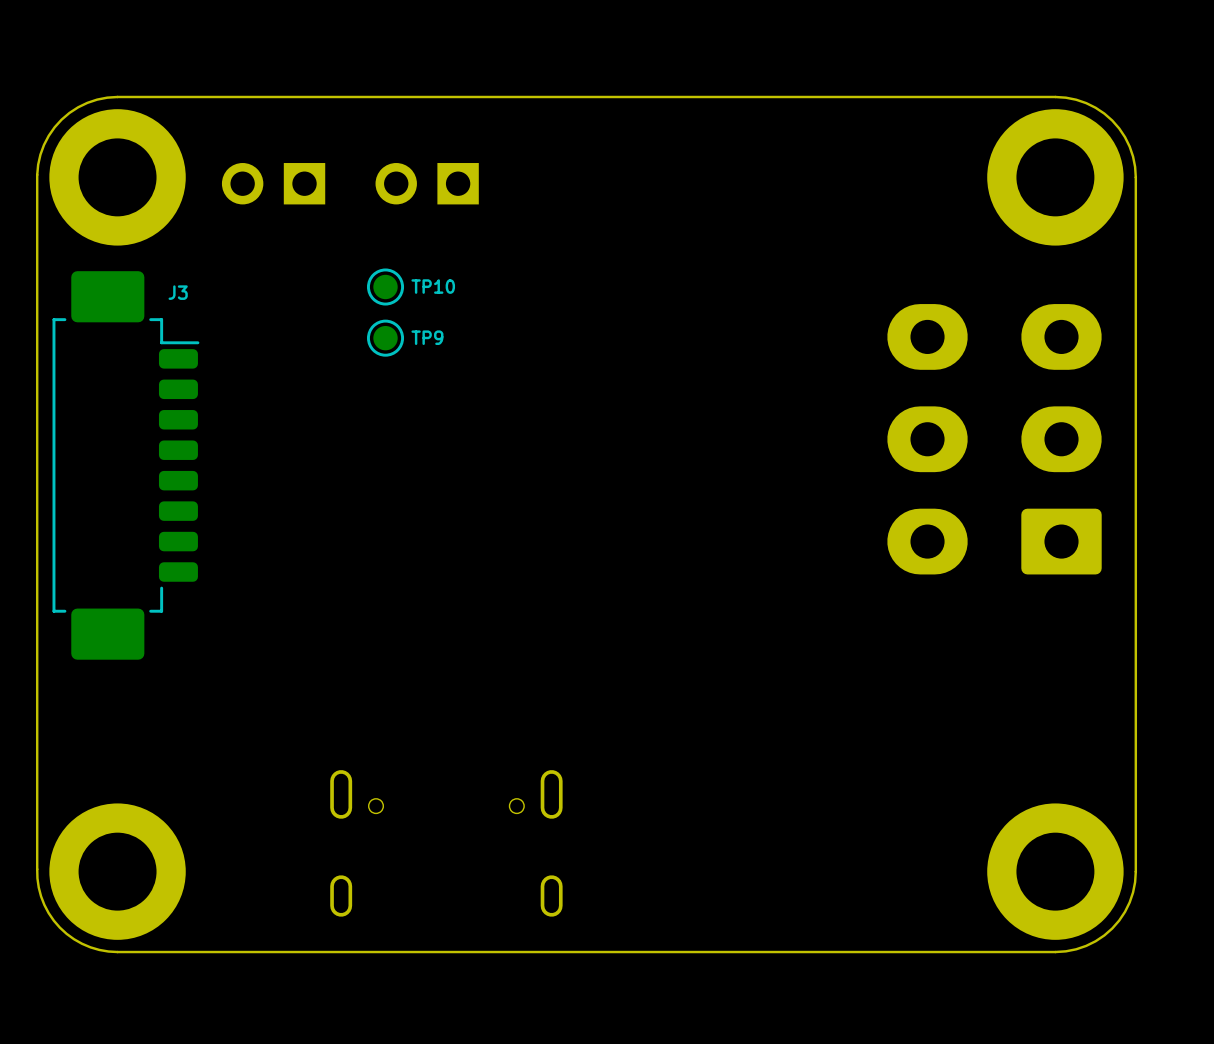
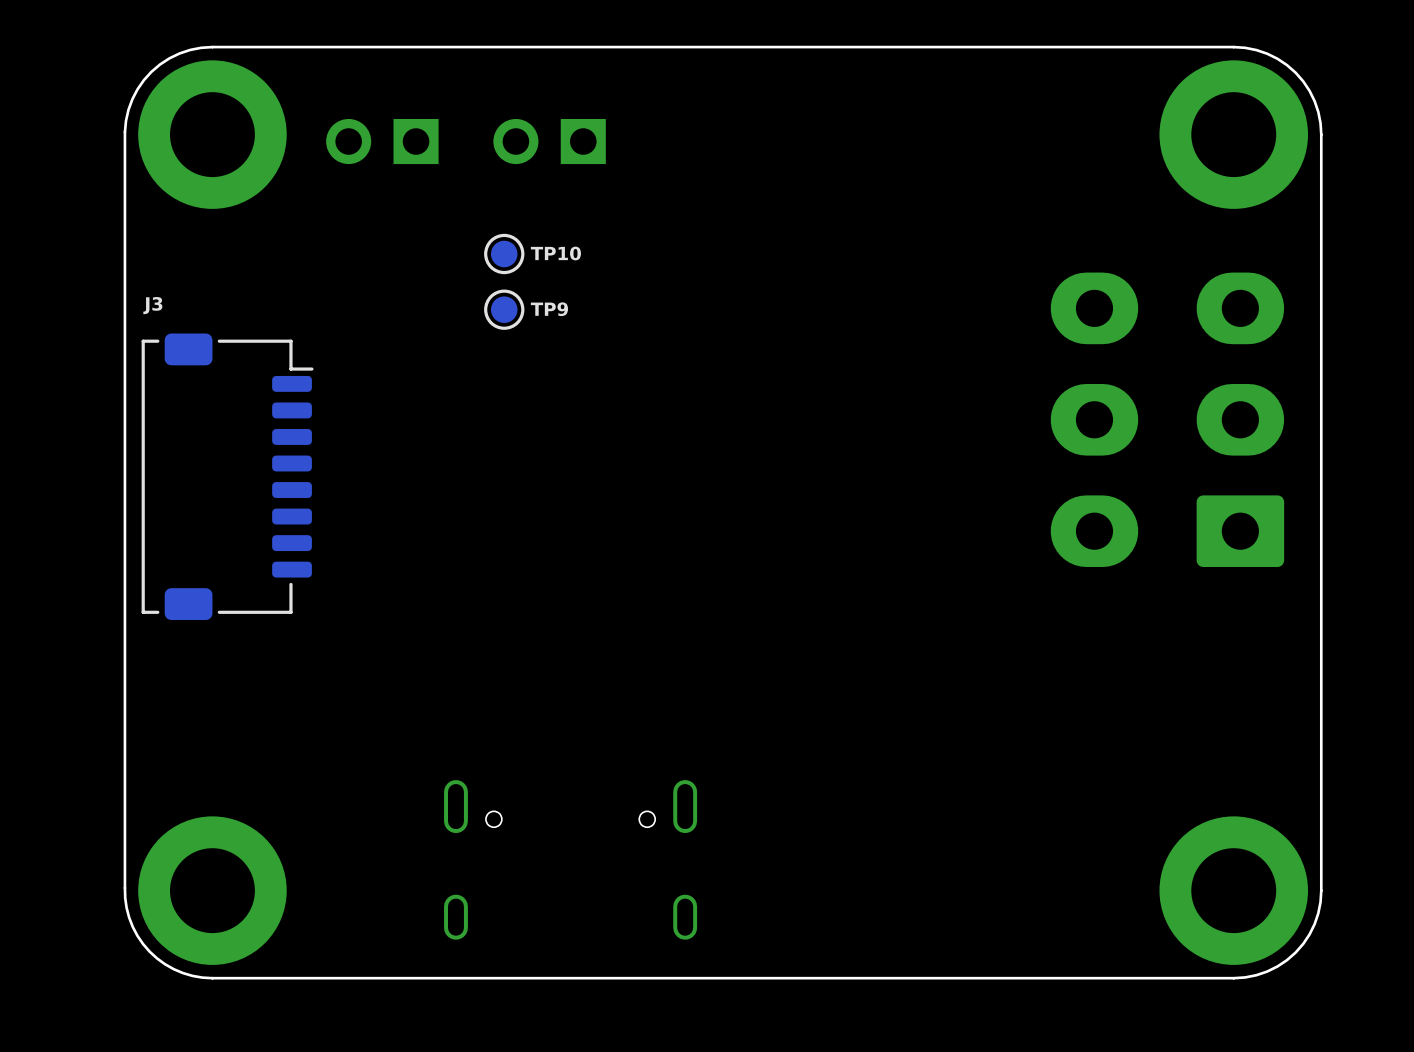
J3 footprint: [52, 271, 200, 660] -> [141, 333, 314, 621]
J3 name position: J3 (178, 292) -> J3 (152, 305)

